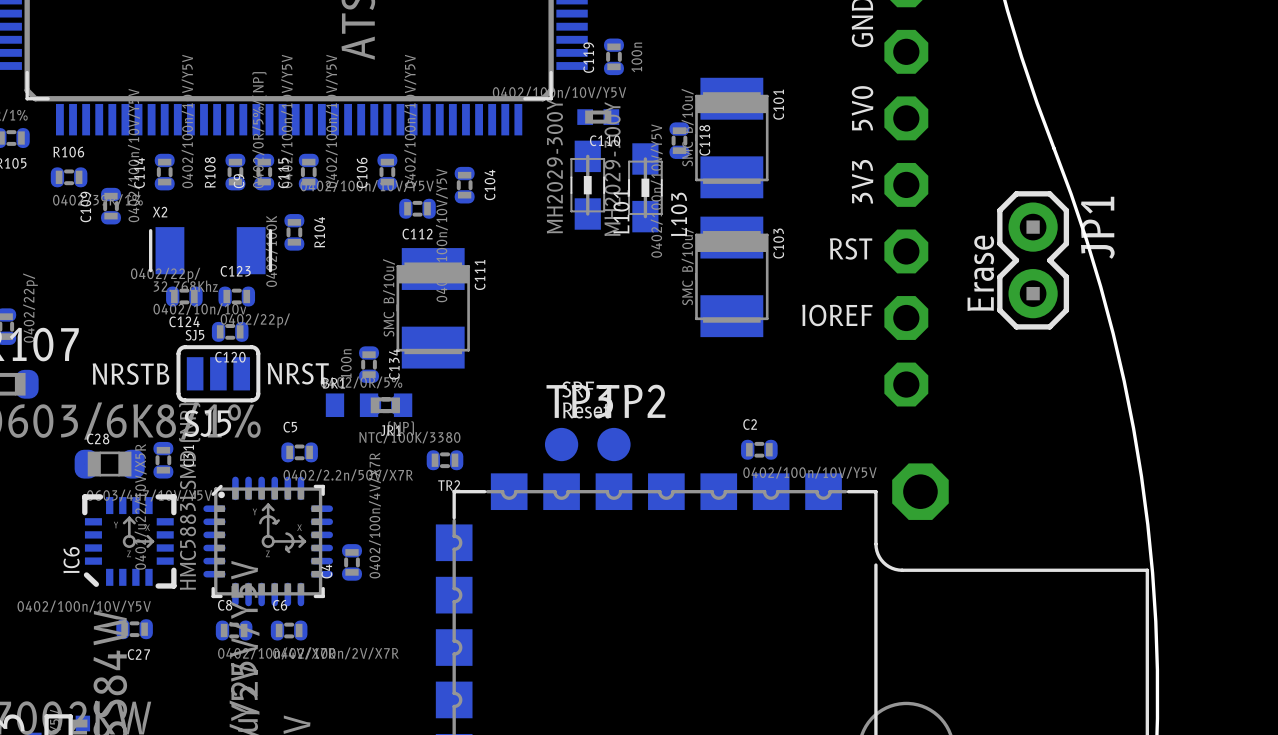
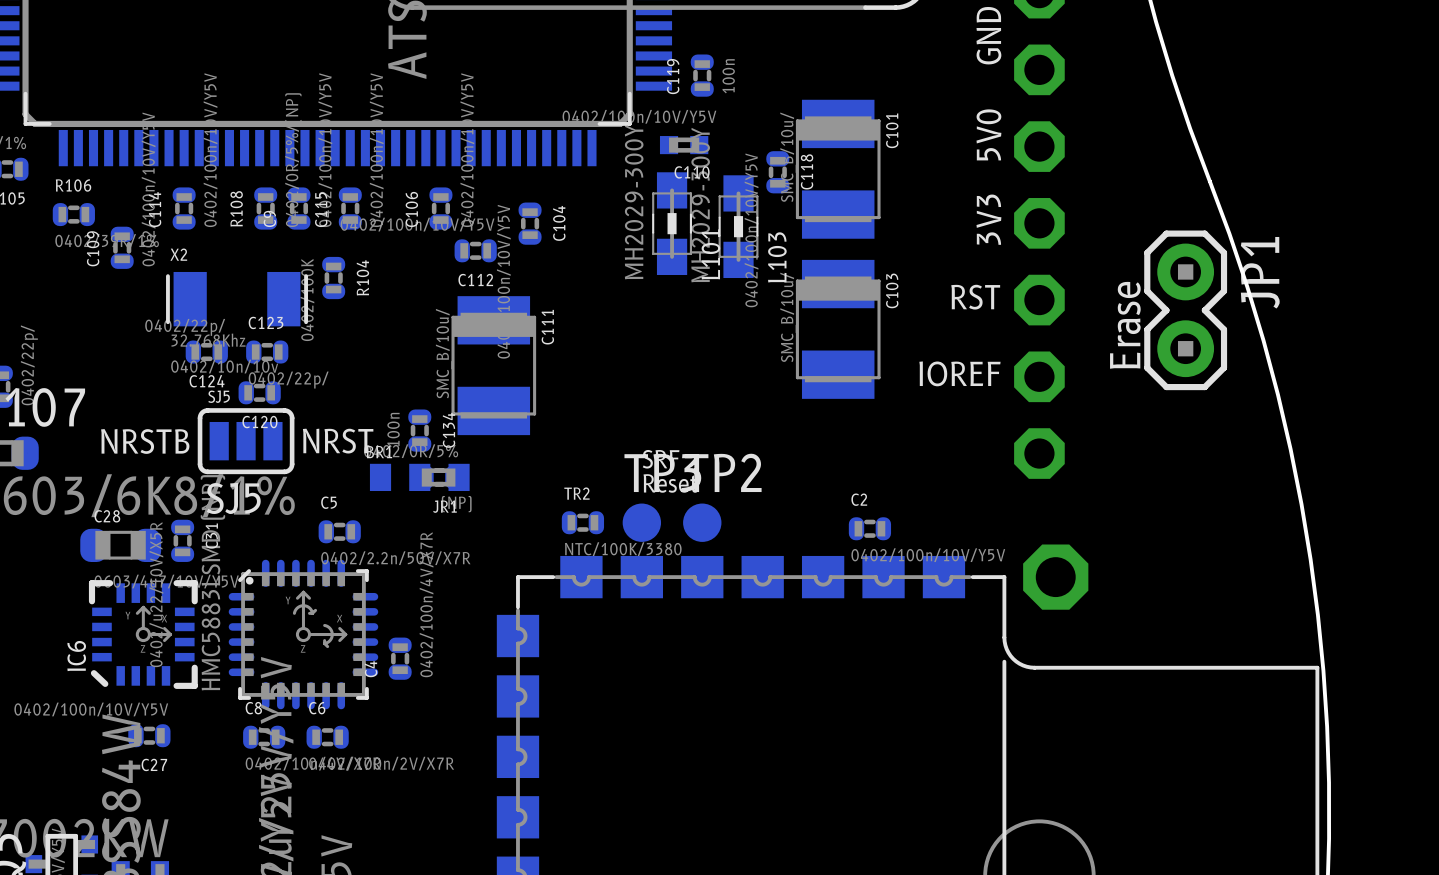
TR2 value position: NTC/100K/3380 (409, 437) -> NTC/100K/3380 (623, 549)
TR2 position: (445, 460) -> (582, 522)
TR2 name position: TR2 (449, 485) -> TR2 (576, 493)

